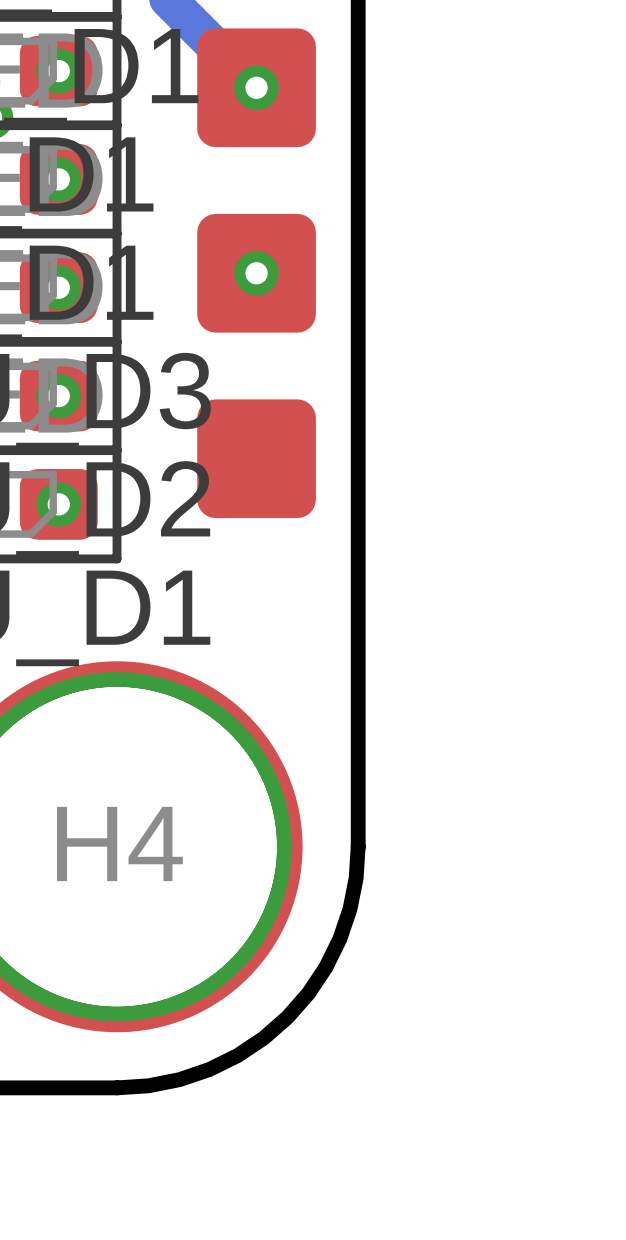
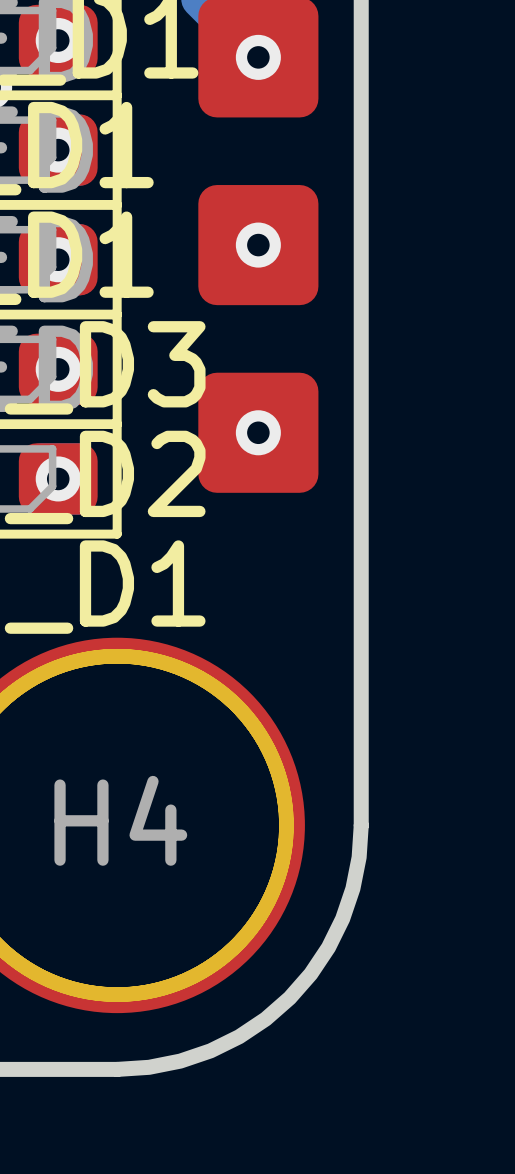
via: none -> (258, 432)

